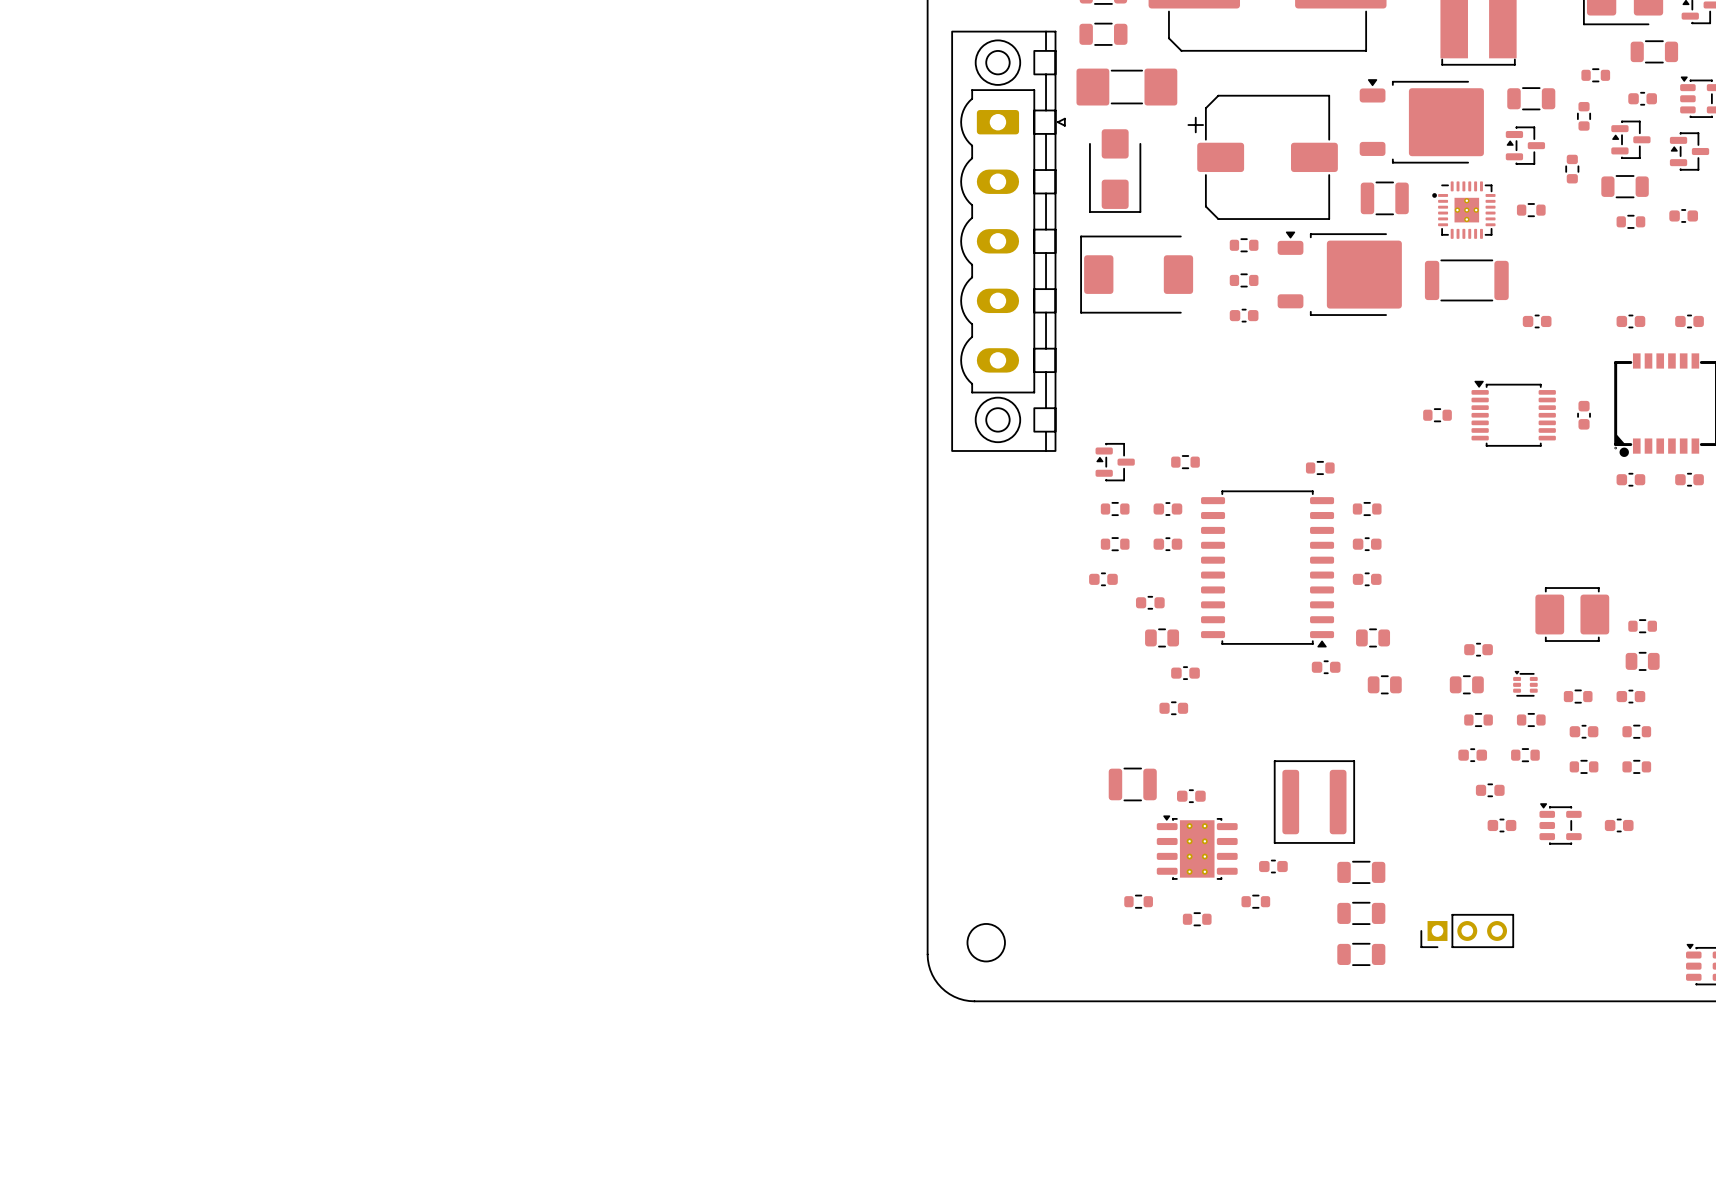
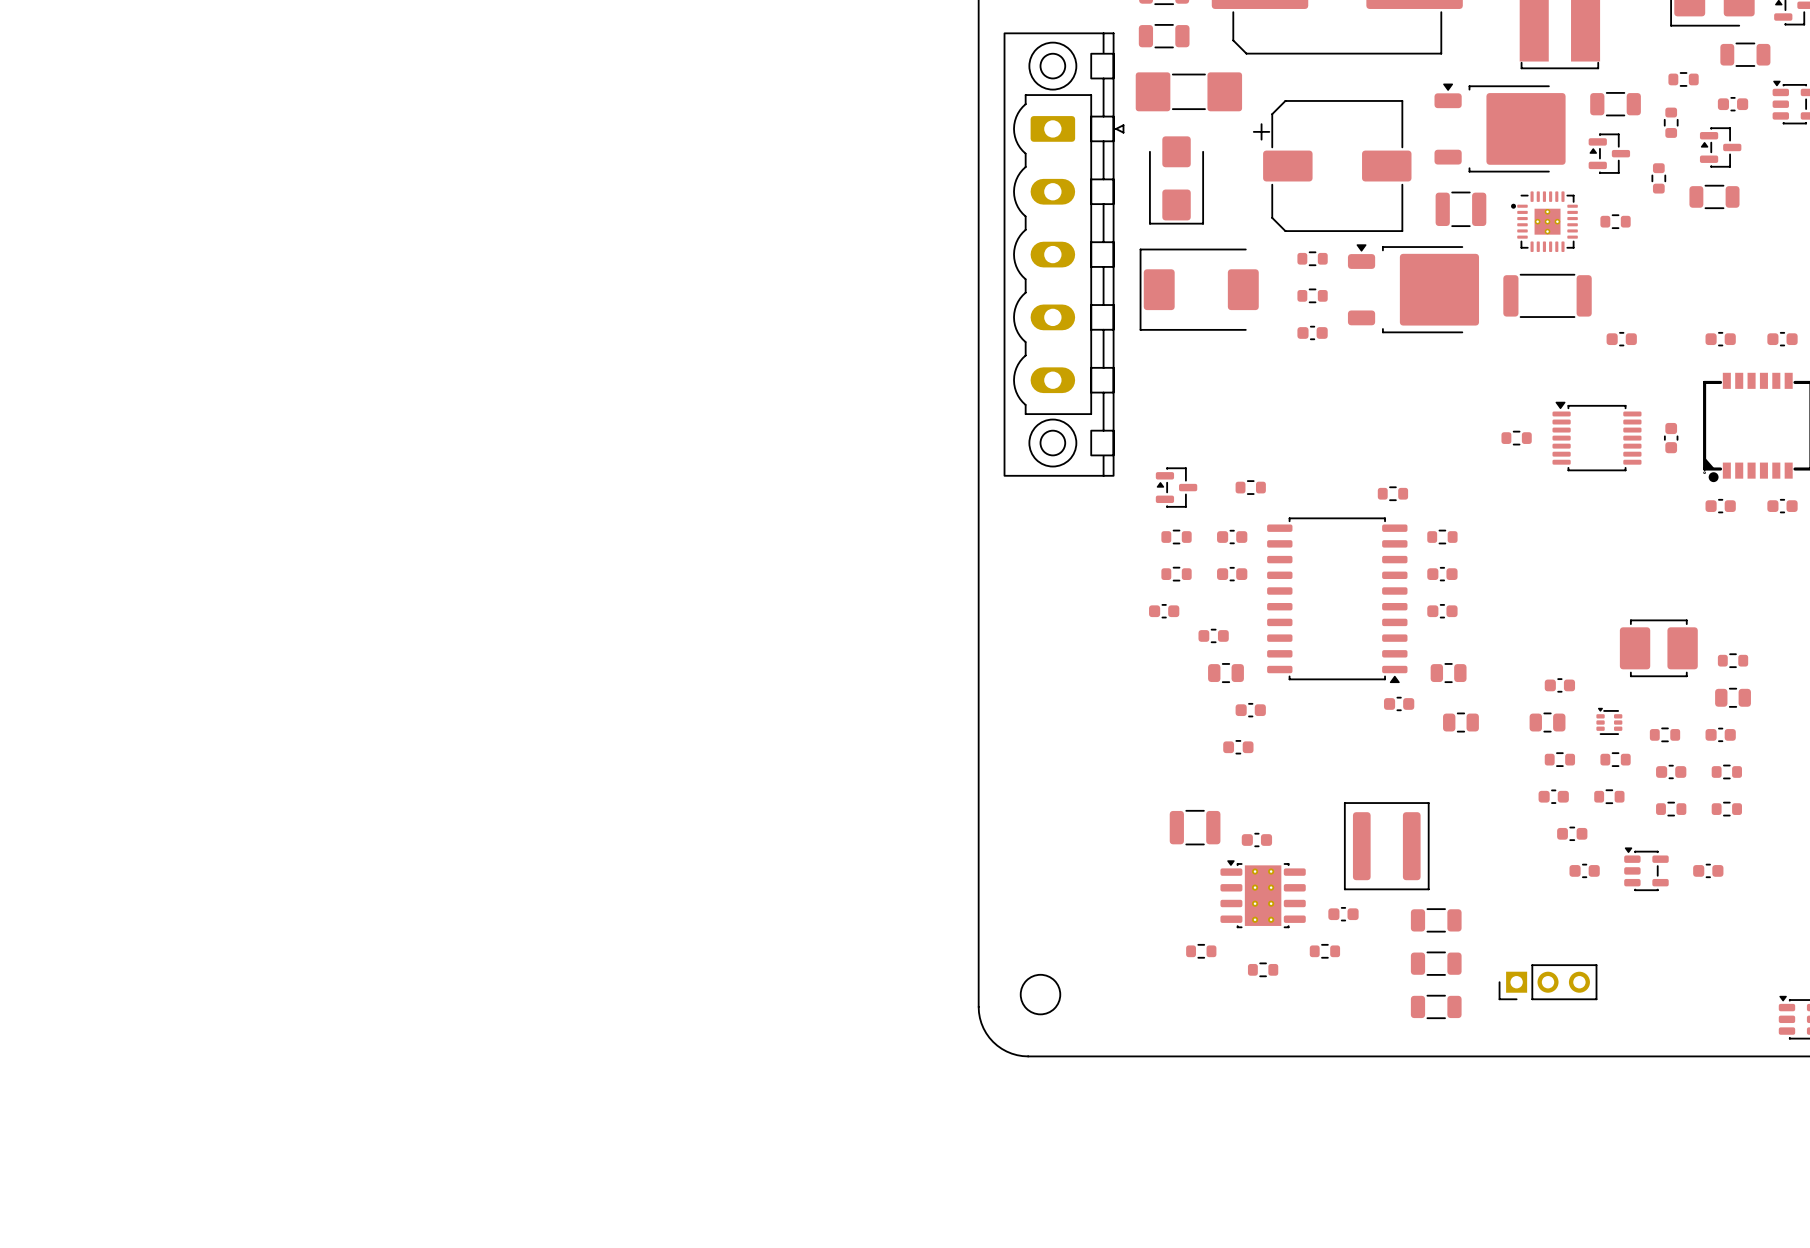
part: (1689, 151) -> none
part: (1683, 215) -> none
part: (1630, 221) -> none

